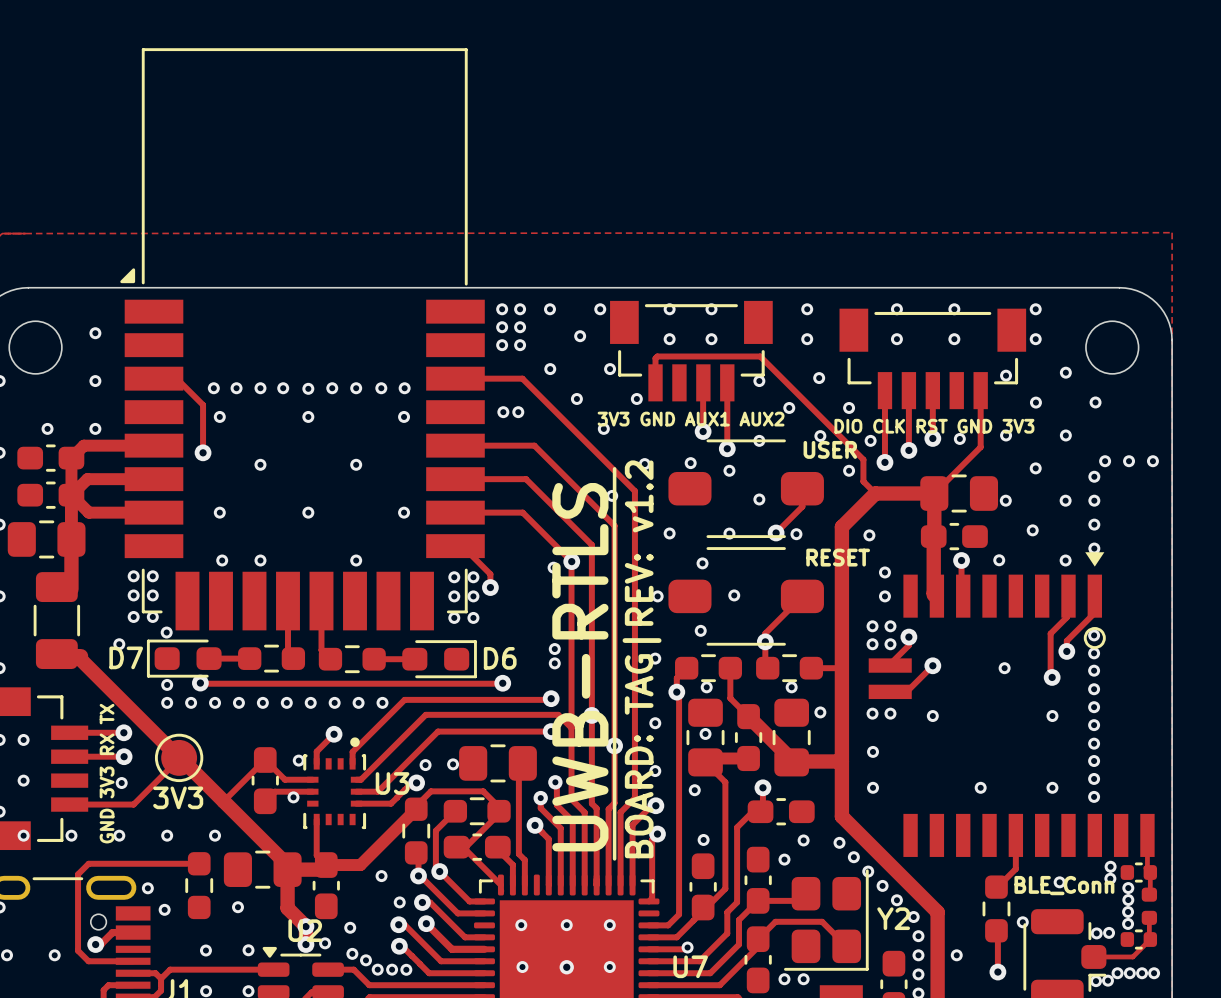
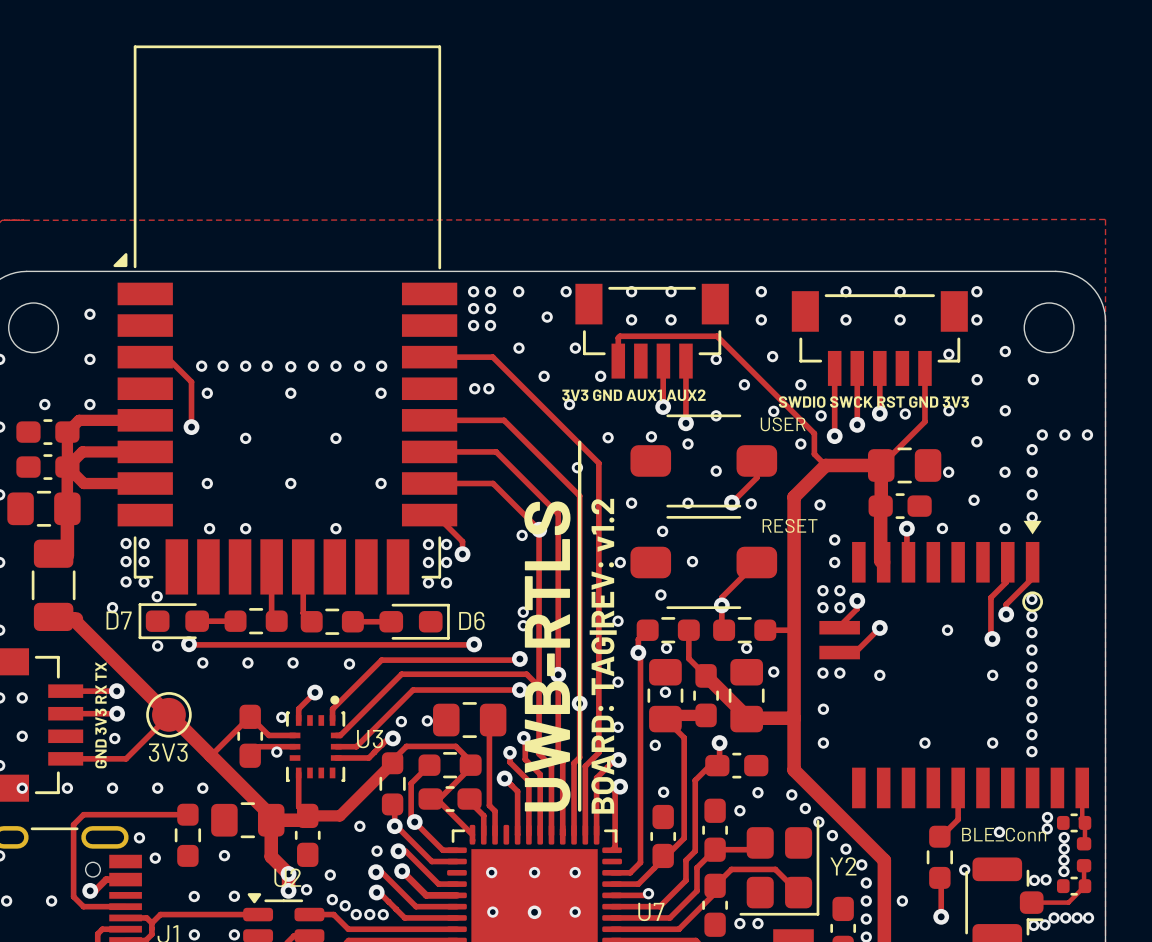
text: DIO CLK RST GND 3V3 (934, 426) -> SWDIO SWCK RST GND 3V3 (873, 402)
via: (167, 702) -> none
via: (191, 702) -> none
via: (238, 702) -> none
via: (286, 702) -> none
via: (334, 702) -> none
via: (358, 702) -> none
via: (382, 702) -> none
via: none -> (349, 664)

